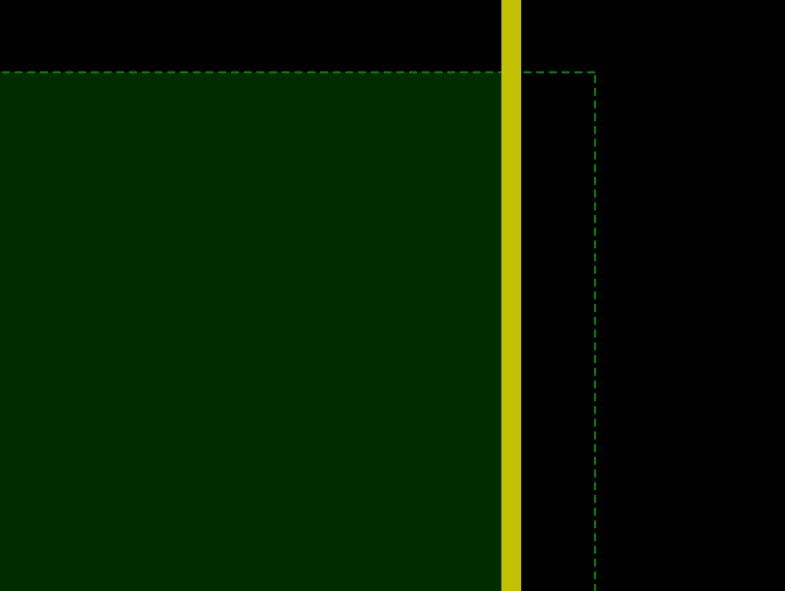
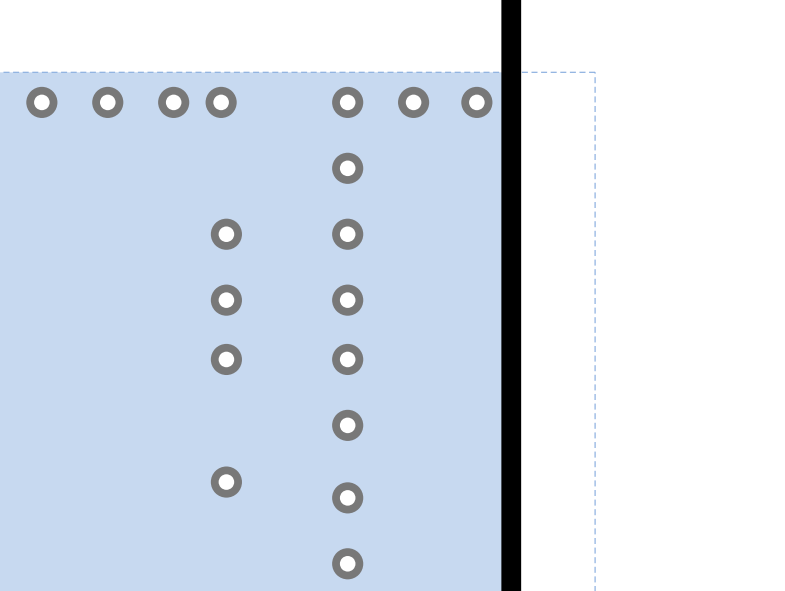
via: none -> (41, 102)
via: none -> (107, 102)
via: none -> (173, 102)
via: none -> (221, 102)
via: none -> (347, 102)
via: none -> (413, 102)
via: none -> (476, 102)
via: none -> (347, 168)
via: none -> (226, 234)
via: none -> (347, 234)
via: none -> (226, 300)
via: none -> (347, 300)
via: none -> (226, 359)
via: none -> (347, 359)
via: none -> (347, 425)
via: none -> (226, 482)
via: none -> (347, 497)
via: none -> (347, 563)

